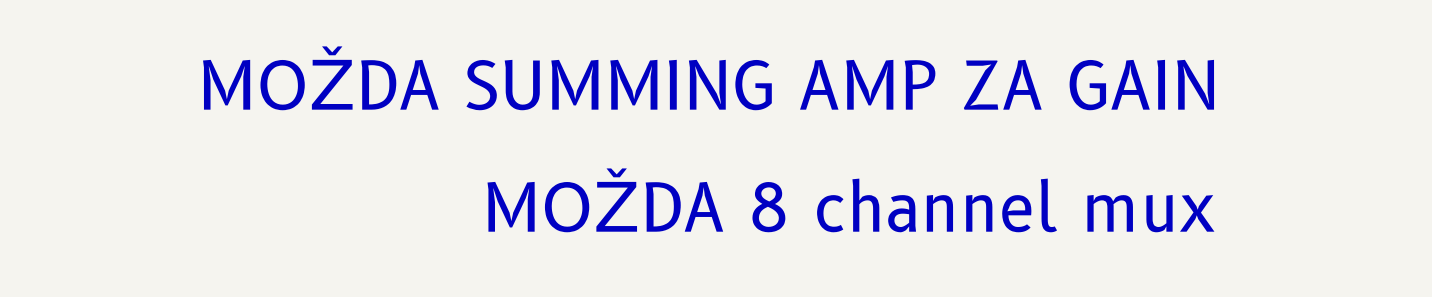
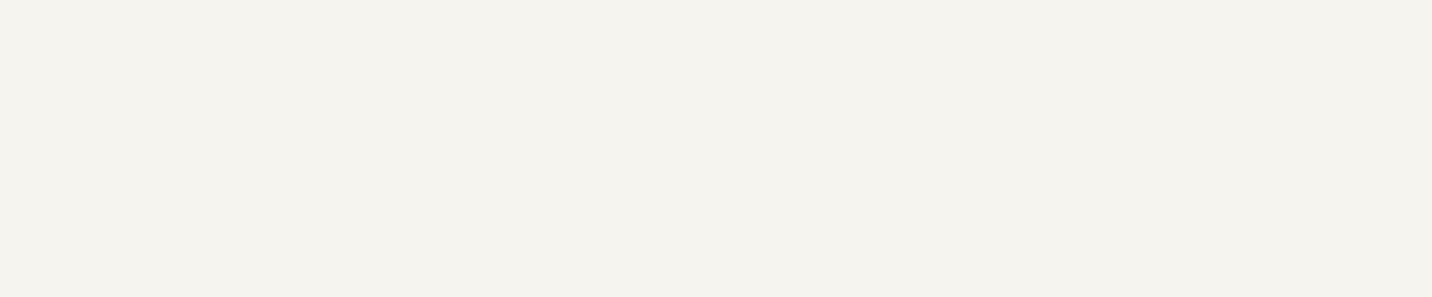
text: MOŽDA SUMMING AMP ZA GAIN (708, 78) -> none
text: MOŽDA 8 channel mux (850, 200) -> none

